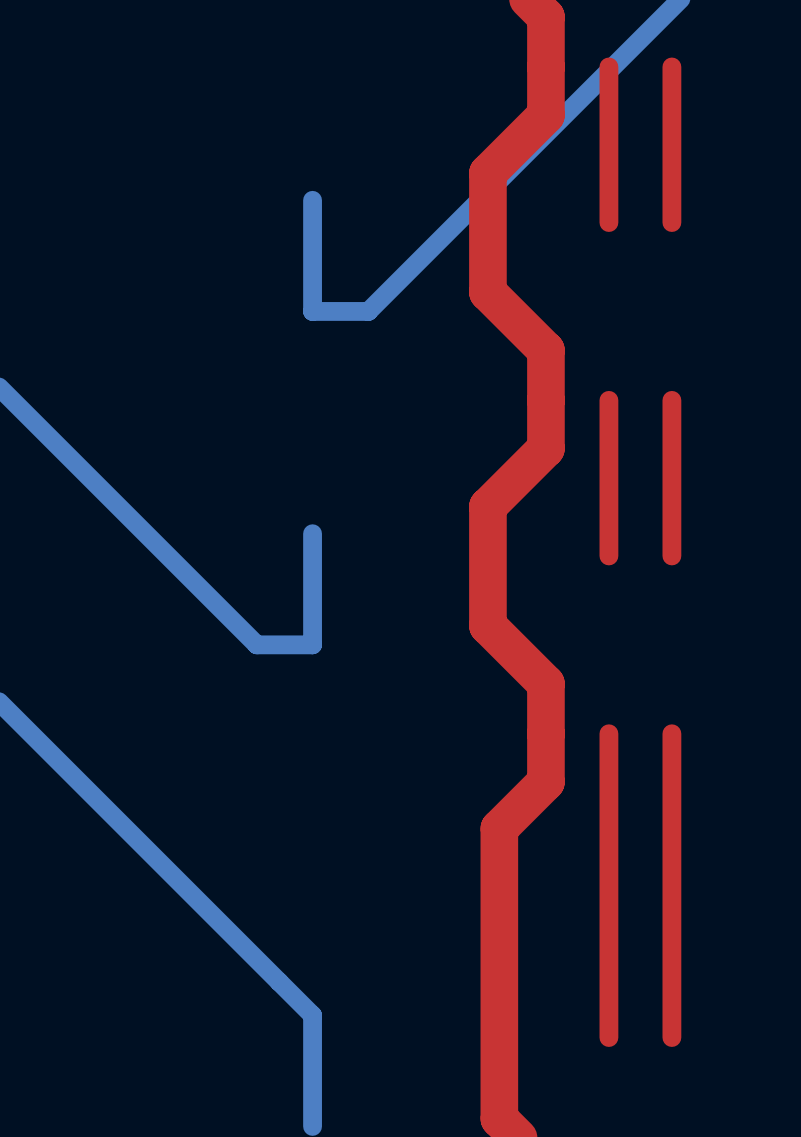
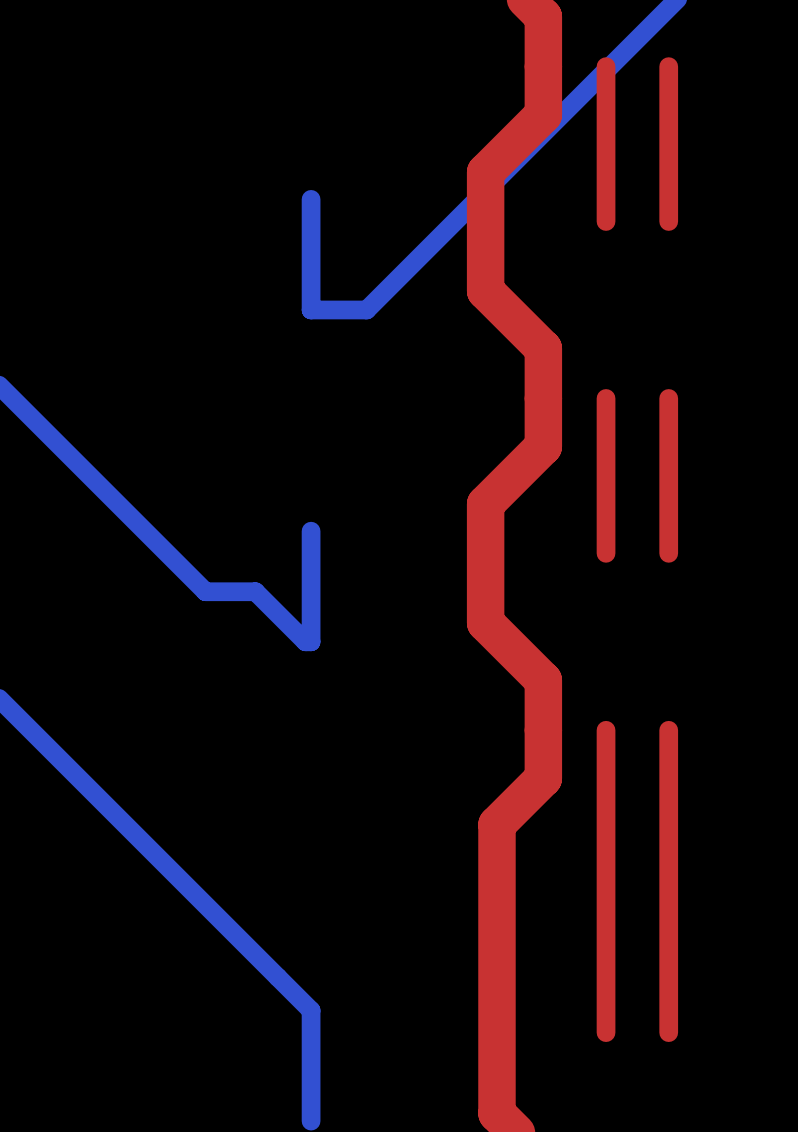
bottom track: (206, 594) (256, 644) (307, 644) -> (205, 591) (255, 591) (305, 641)

